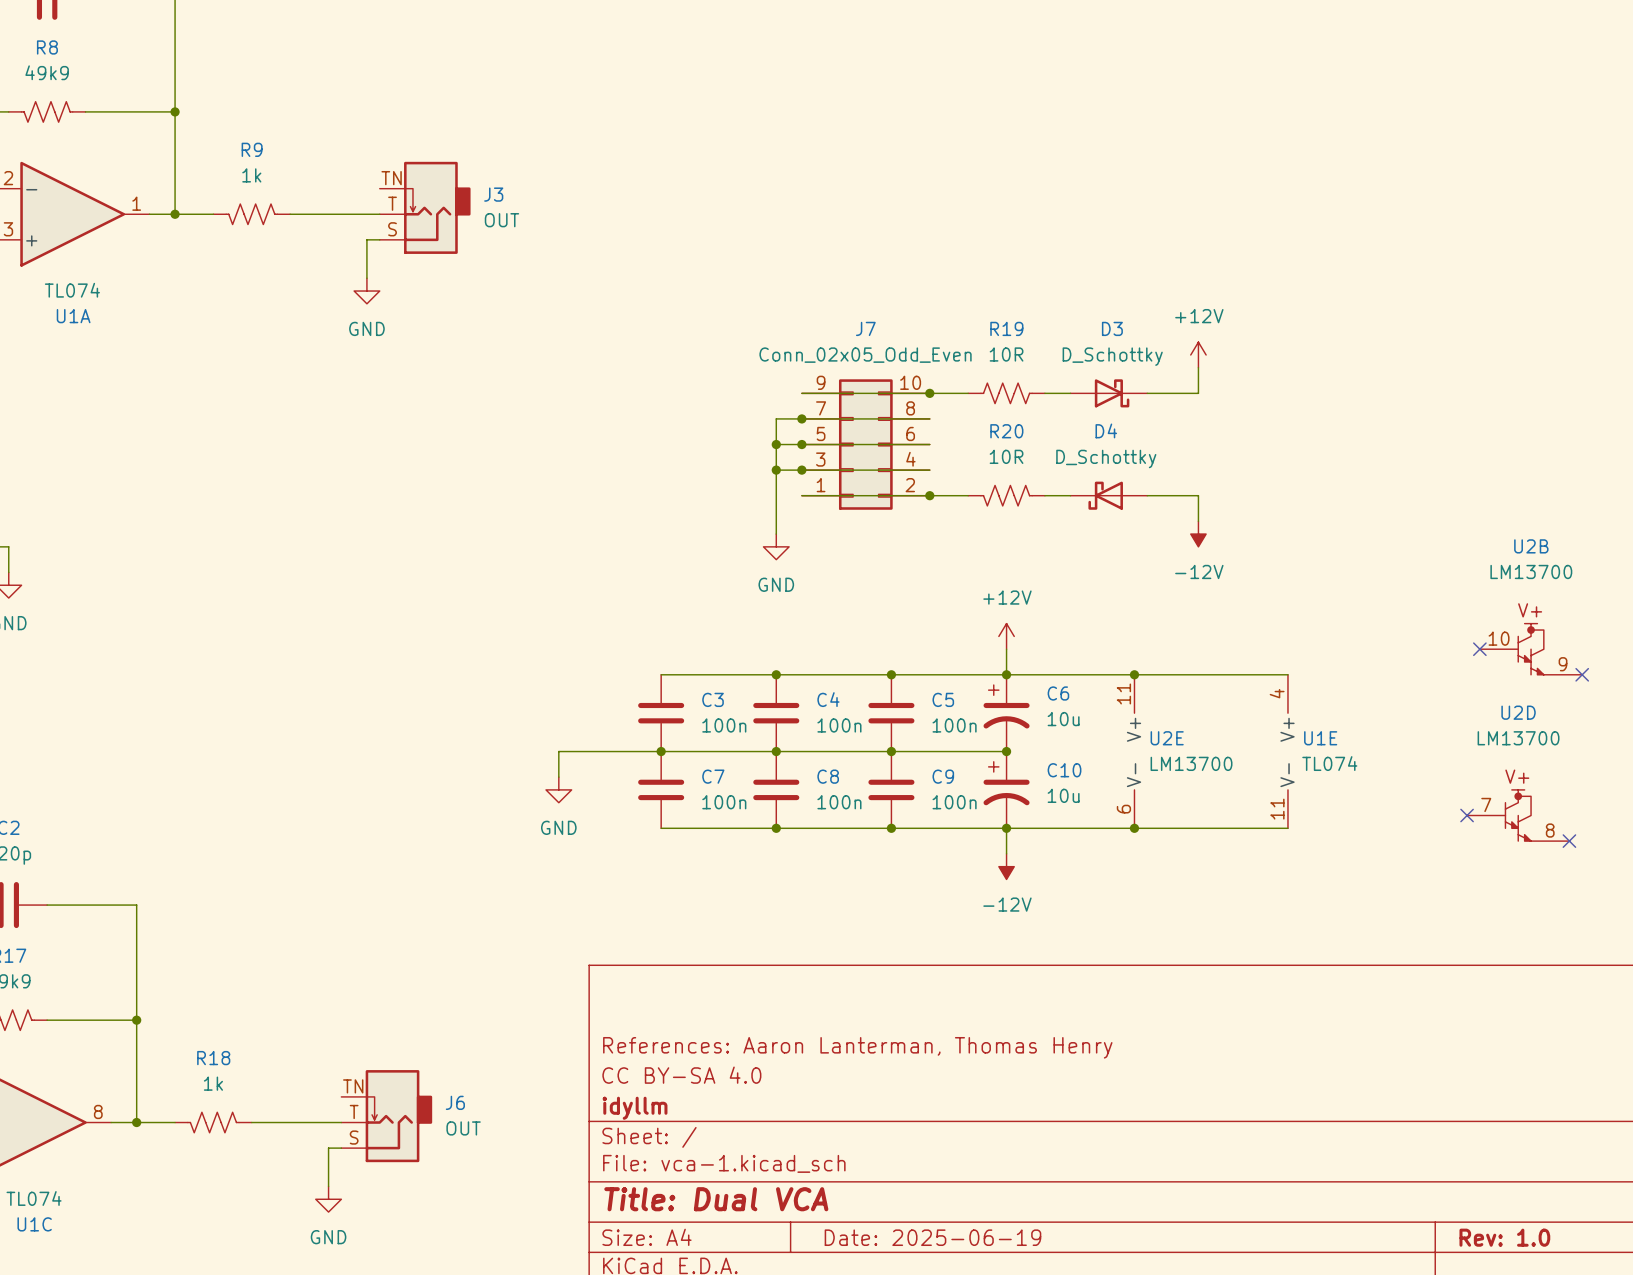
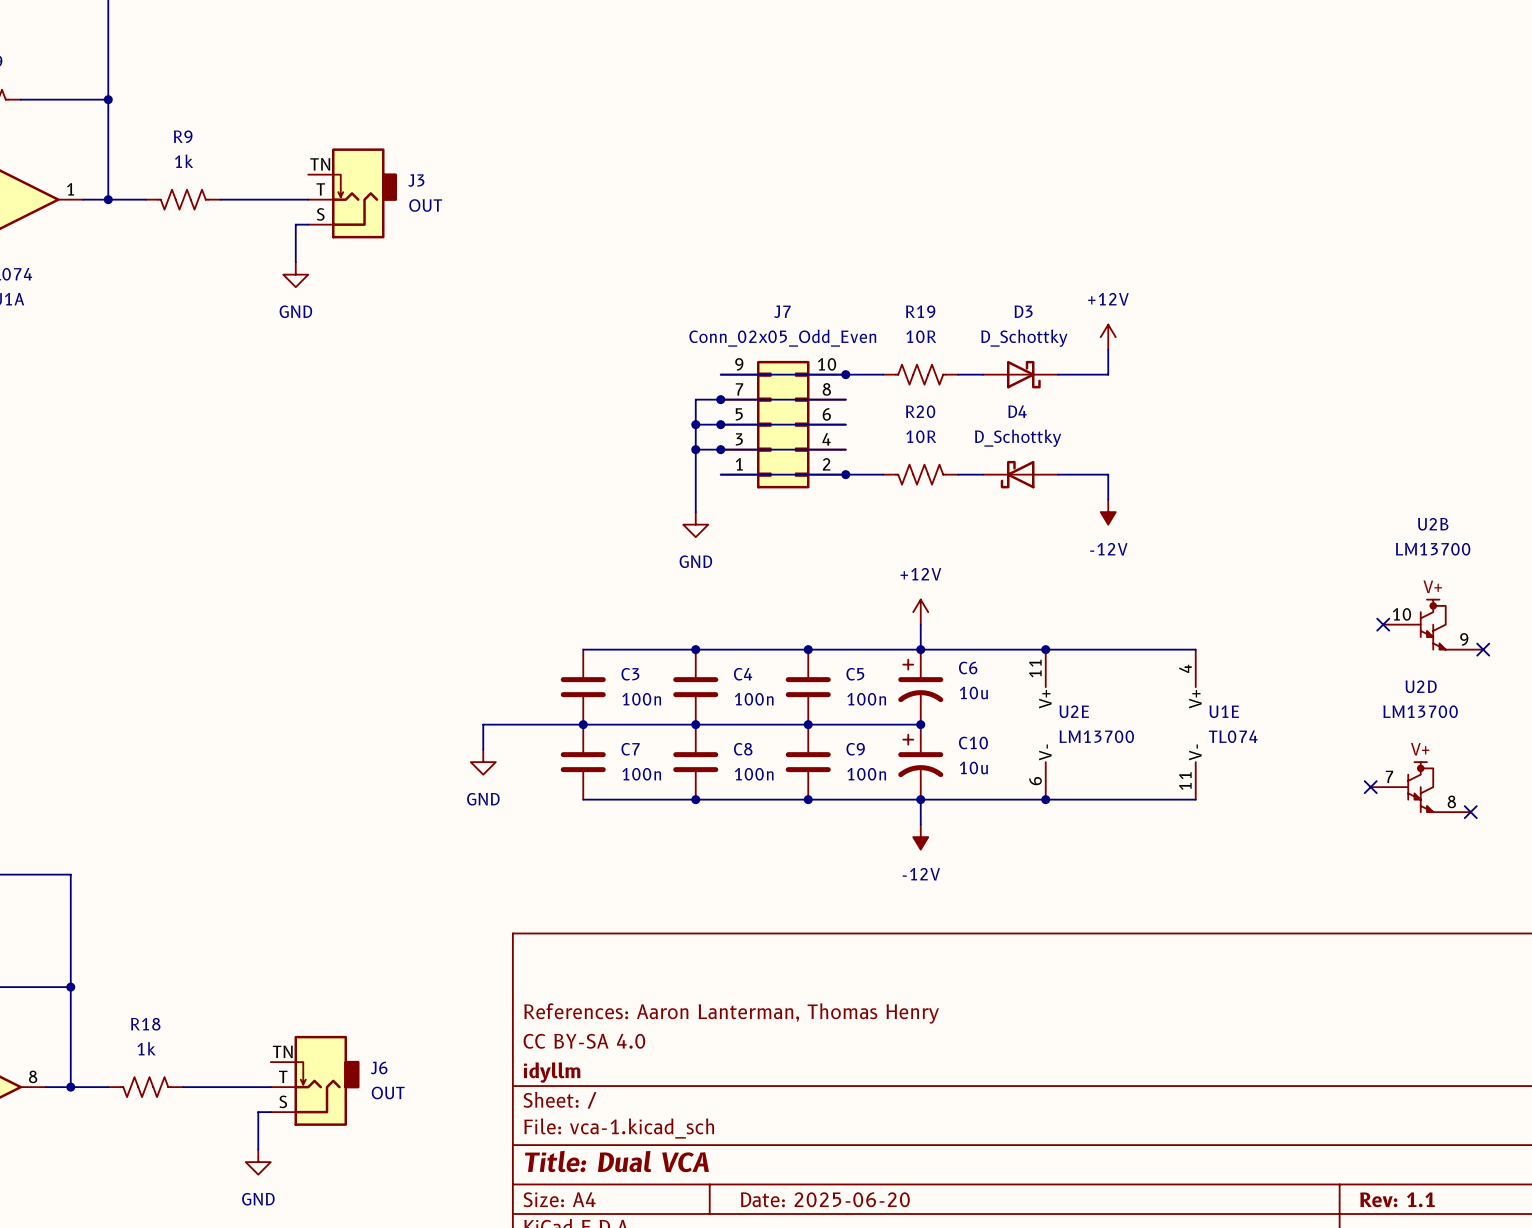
title block: Date: 2025-06-19 (932, 1237) -> Date: 2025-06-20 (825, 1199)
title block: Rev: 1.0 (1504, 1237) -> Rev: 1.1 (1397, 1199)

